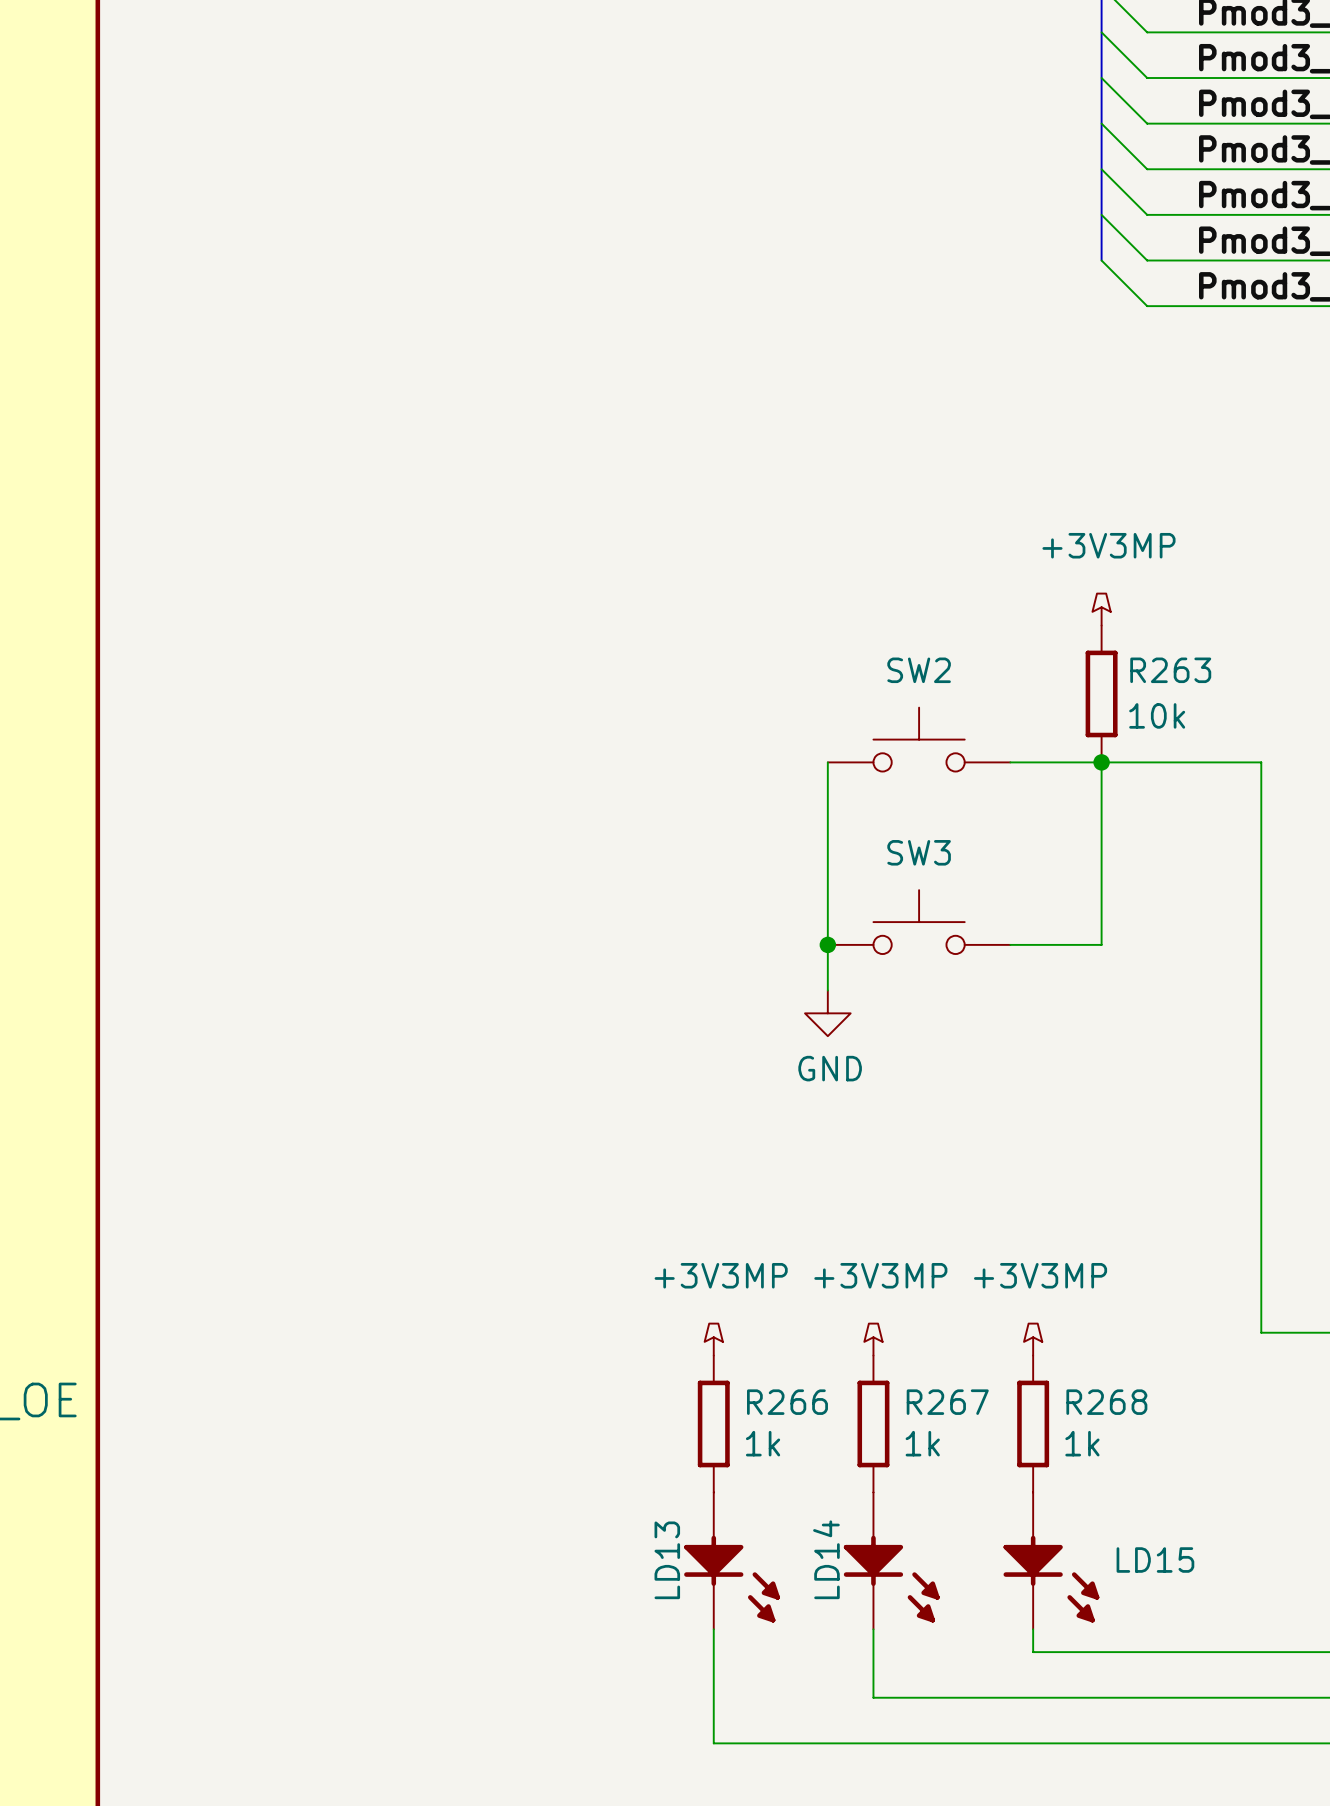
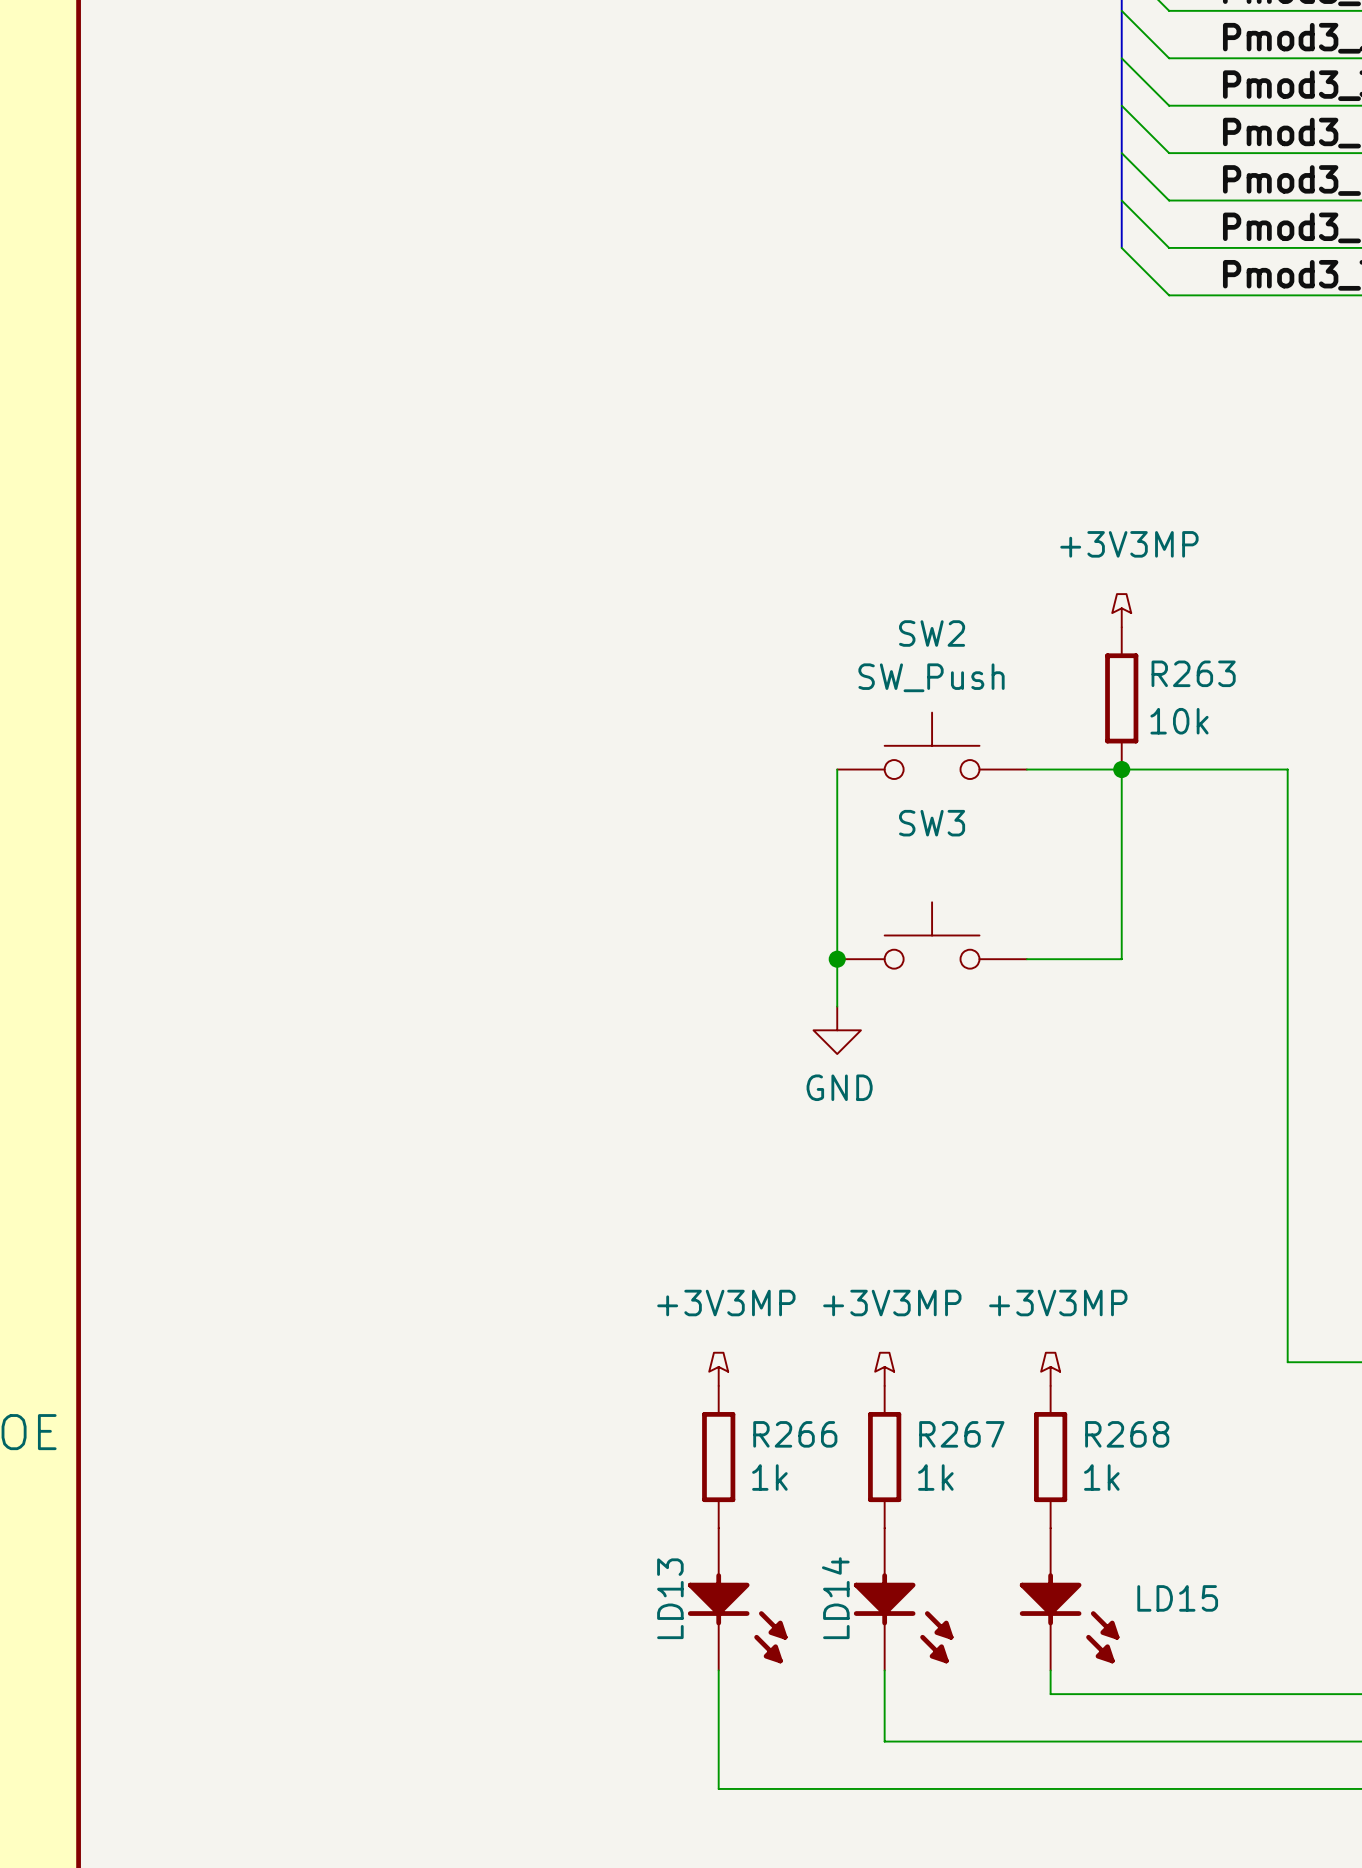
SW2 name position: SW2 (919, 670) -> SW2 (932, 633)
SW2 value: none -> SW_Push (931, 677)
SW3 name position: SW3 (919, 852) -> SW3 (932, 823)

